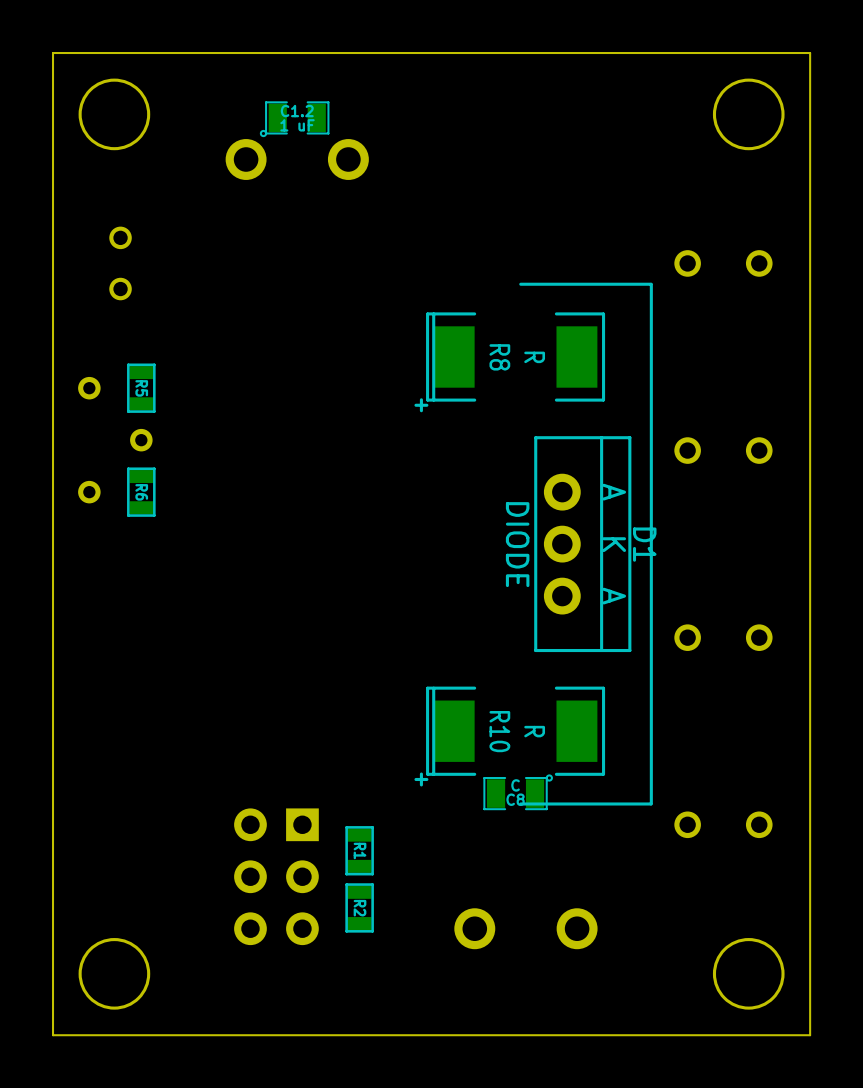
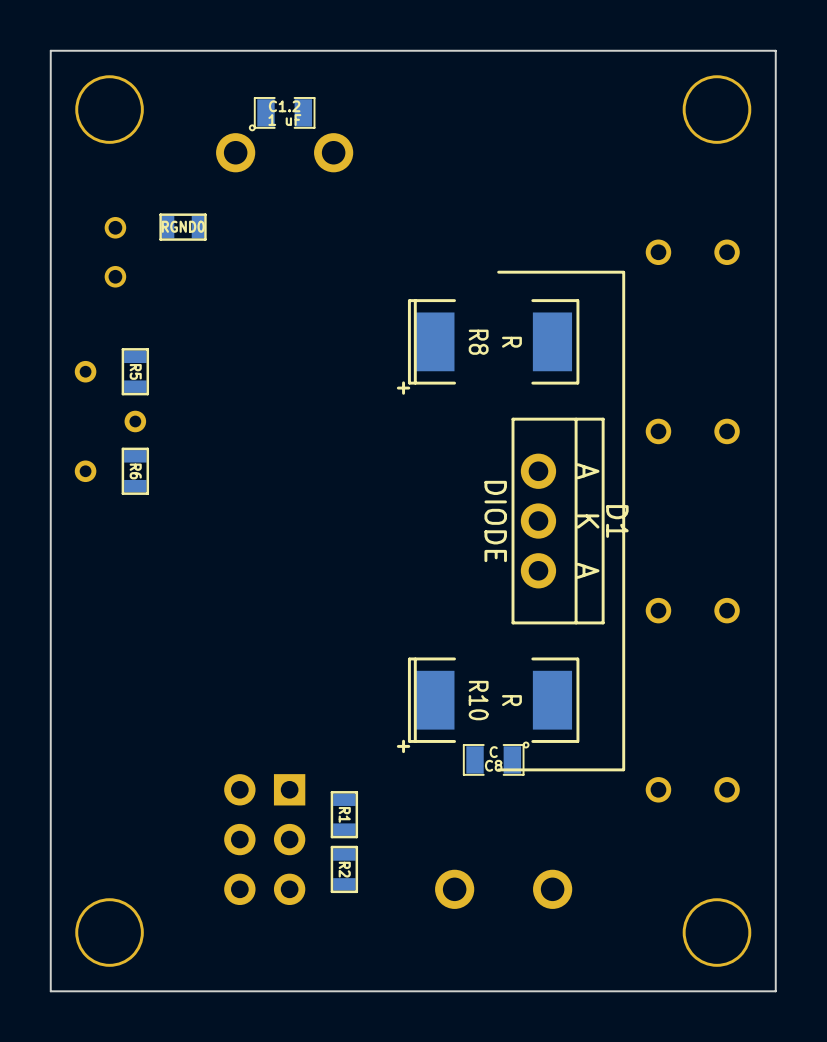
RGND0: none -> (183, 227)

